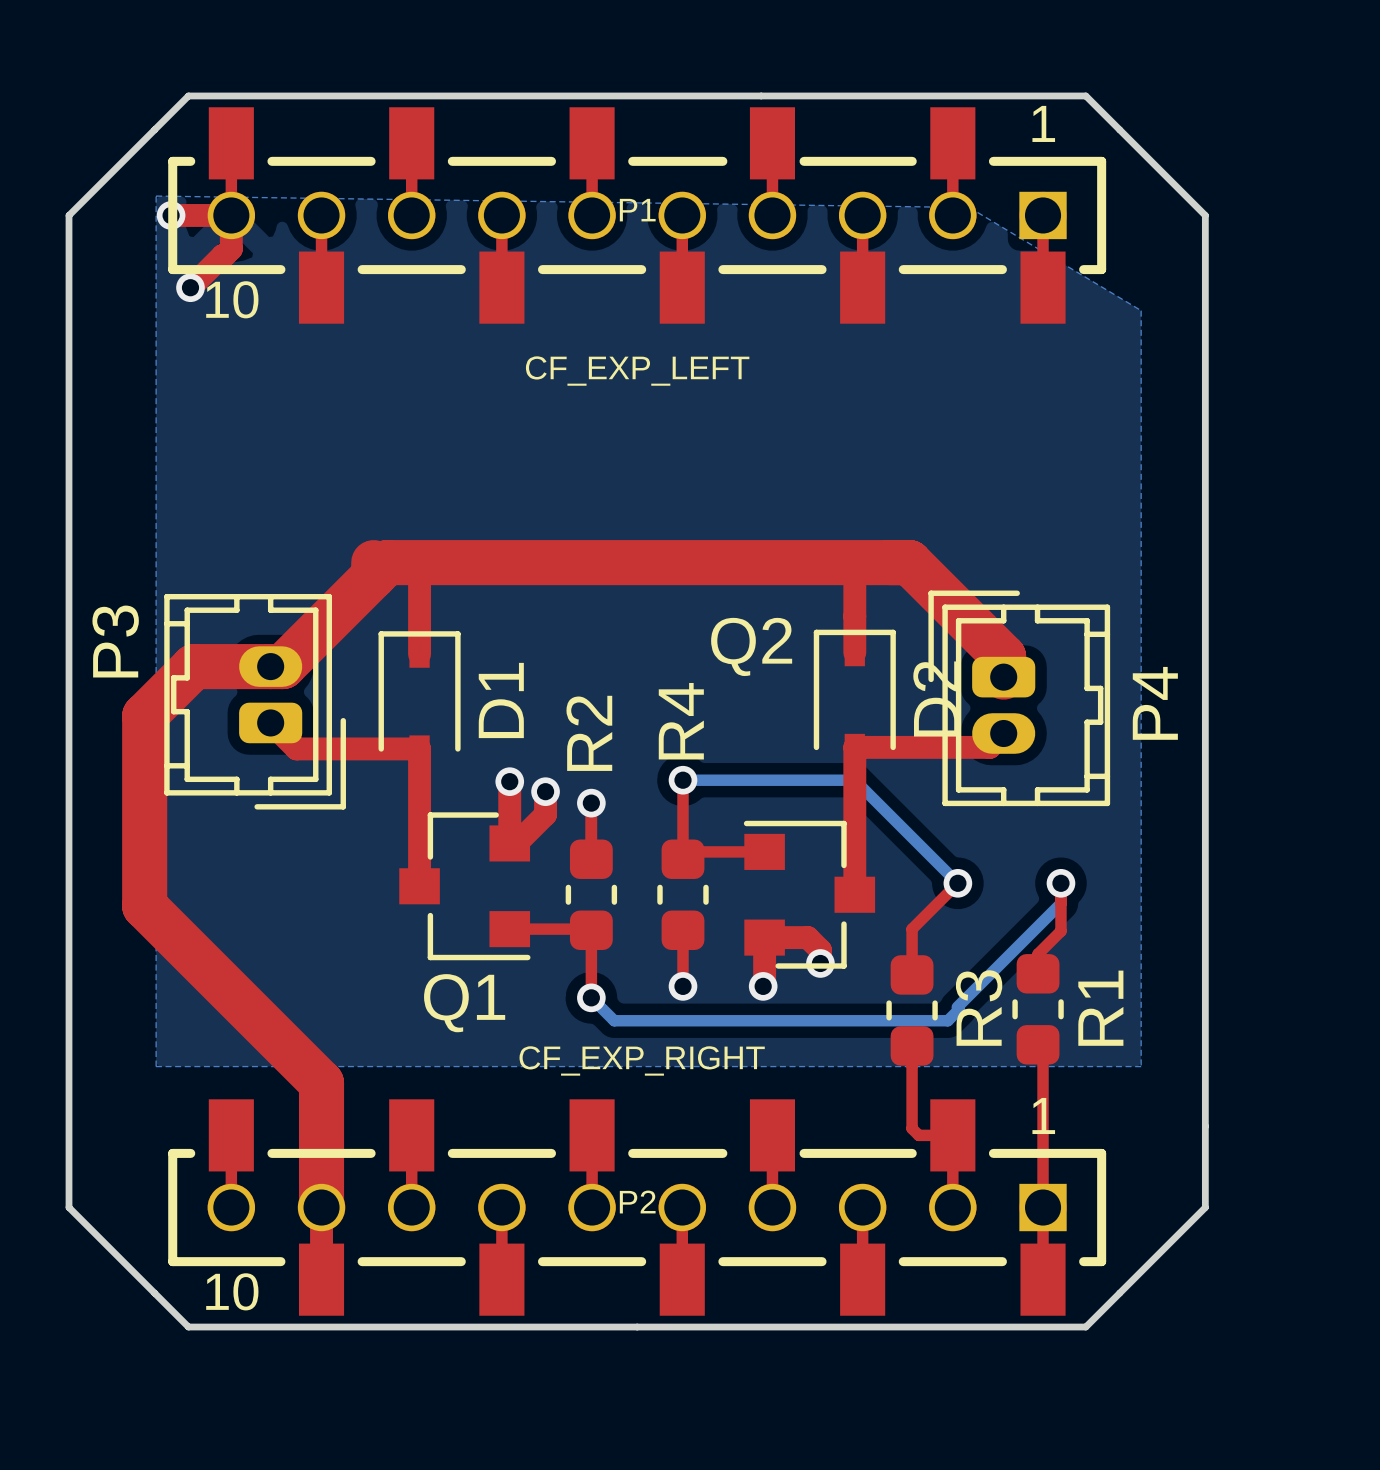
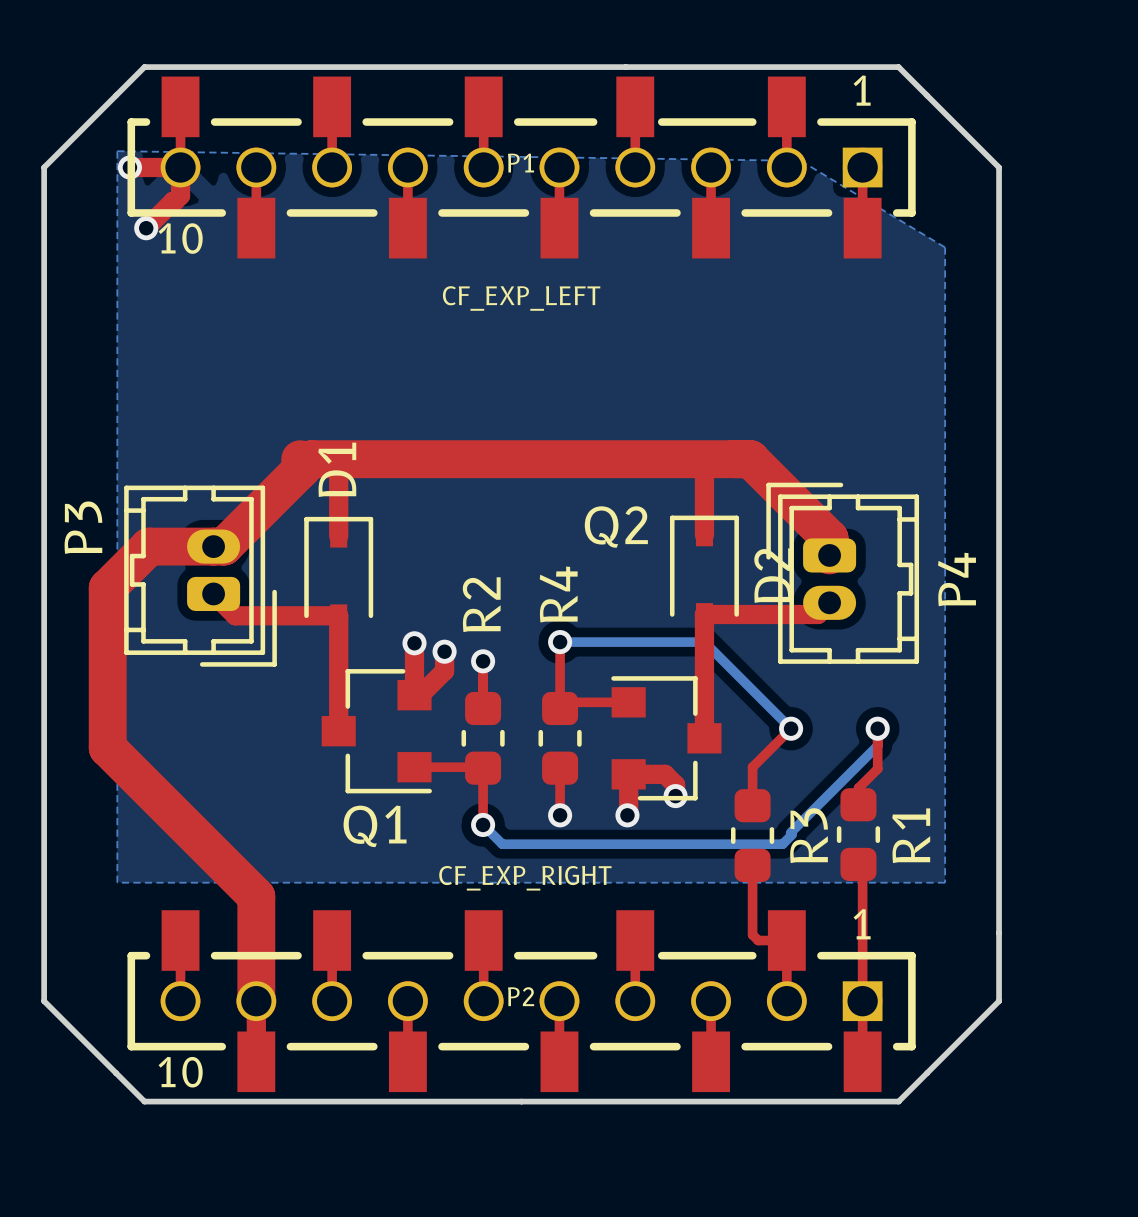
D1 name position: D1 (501, 700) -> D1 (337, 469)

